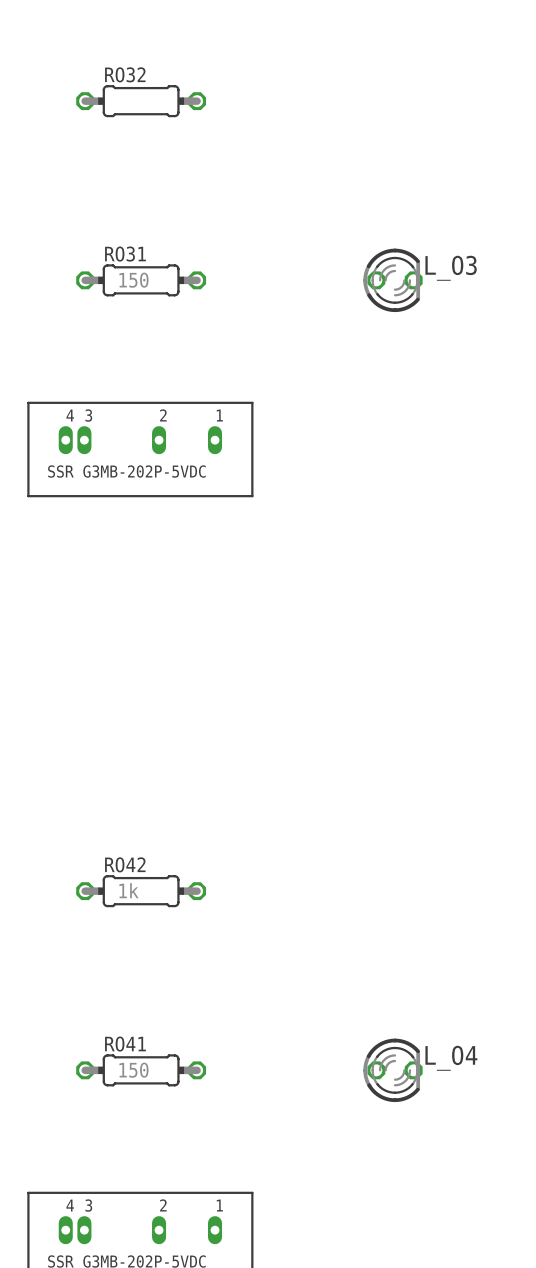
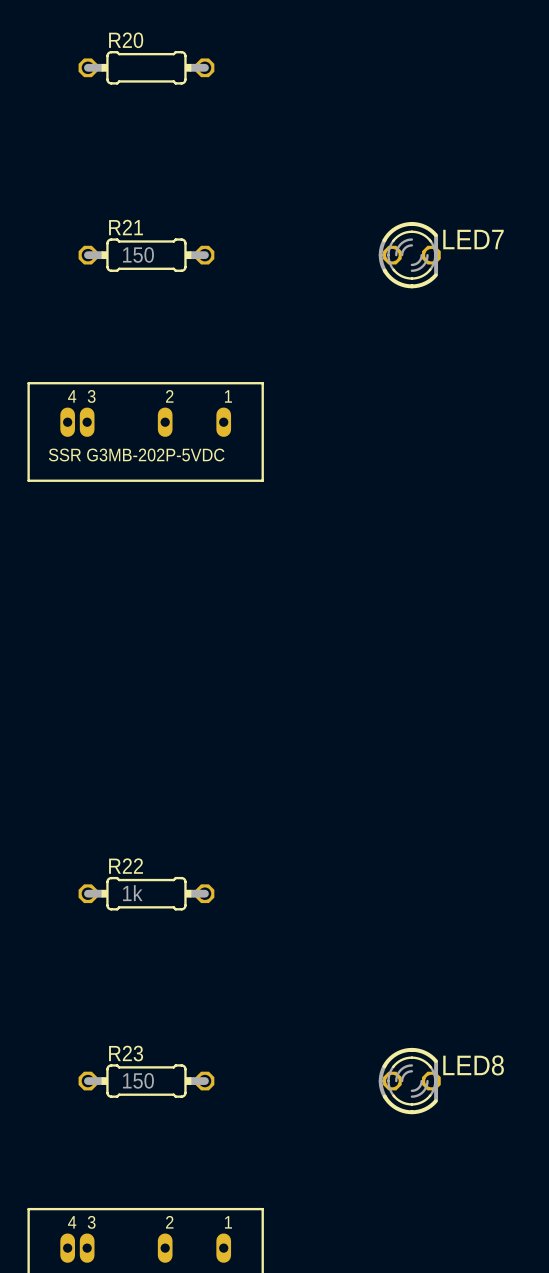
RO32 name: RO32 (125, 74) -> R20 (126, 40)
RO31 name: RO31 (125, 254) -> R21 (126, 227)
L_O3 name: L_O3 (451, 268) -> LED7 (473, 239)
RO42 name: RO42 (125, 864) -> R22 (126, 866)
RO41 name: RO41 (125, 1044) -> R23 (126, 1053)
L_O4 name: L_O4 (451, 1058) -> LED8 (473, 1065)

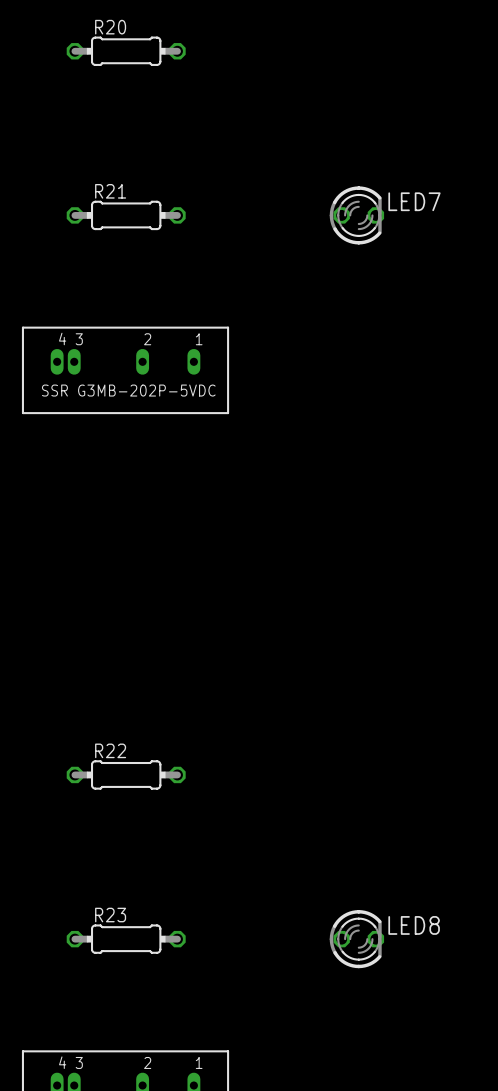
R21 value: 150 (138, 254) -> none
R22 value: 1k (132, 893) -> none
R23 value: 150 (138, 1080) -> none

